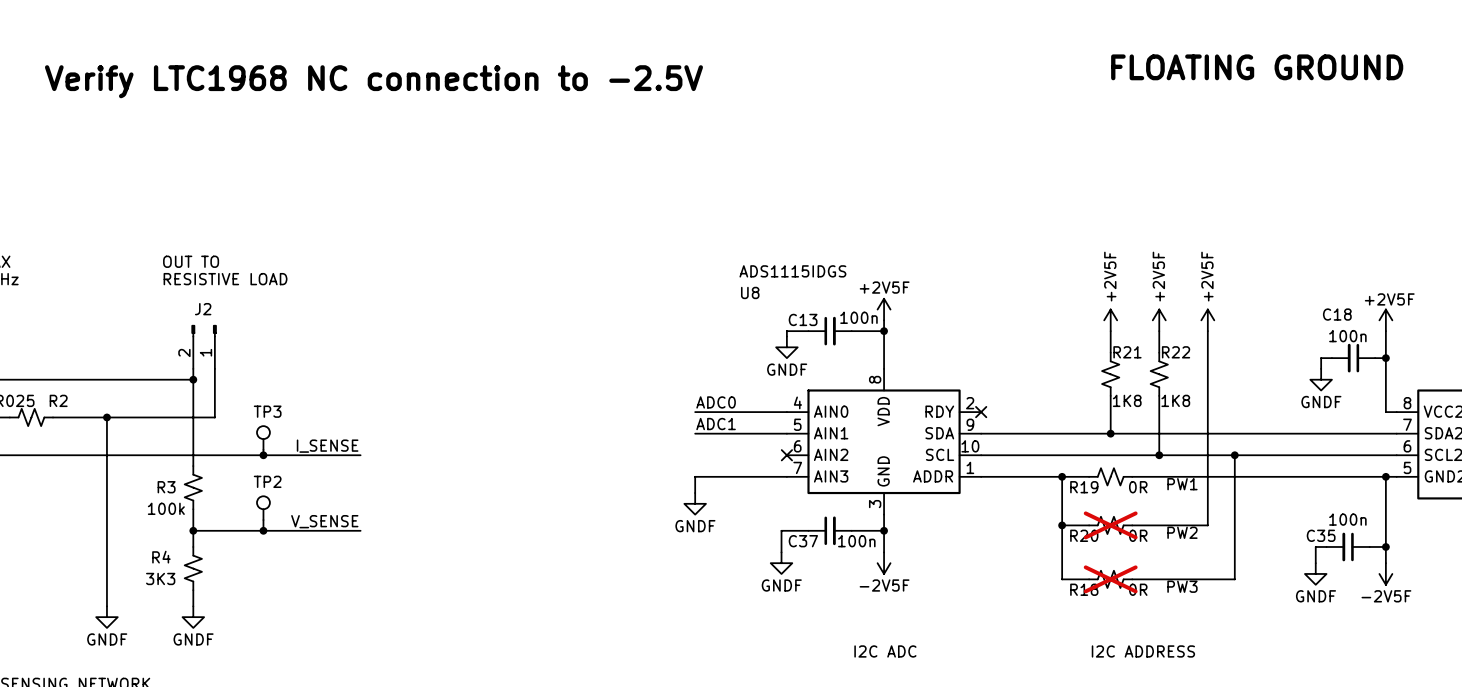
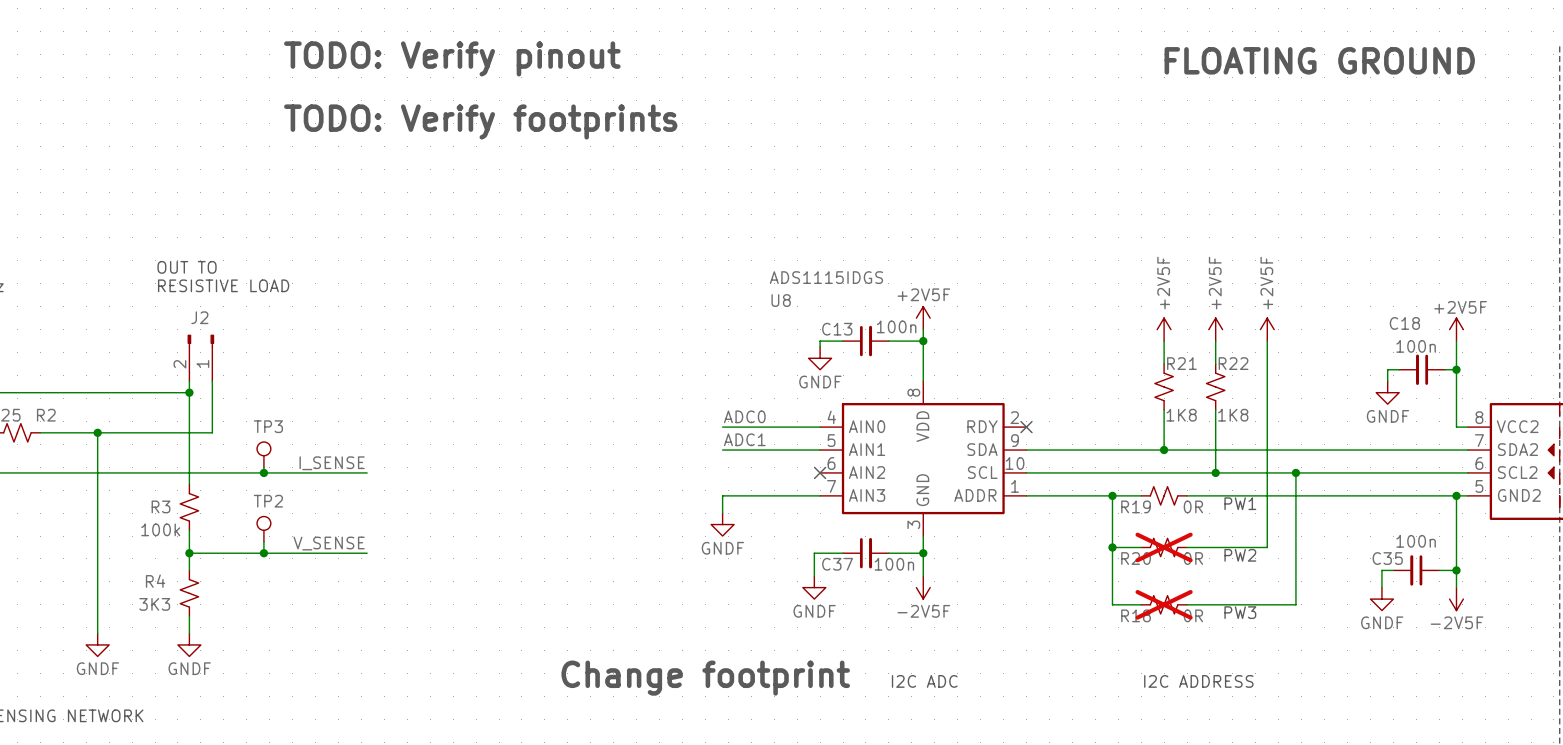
text: none -> TODO: Verify pinout (452, 58)
text: Verify LTC1968 NC connection to -2.5V (373, 81) -> none
text: none -> TODO: Verify footprints (480, 121)
text: none -> Change footprint (705, 678)

